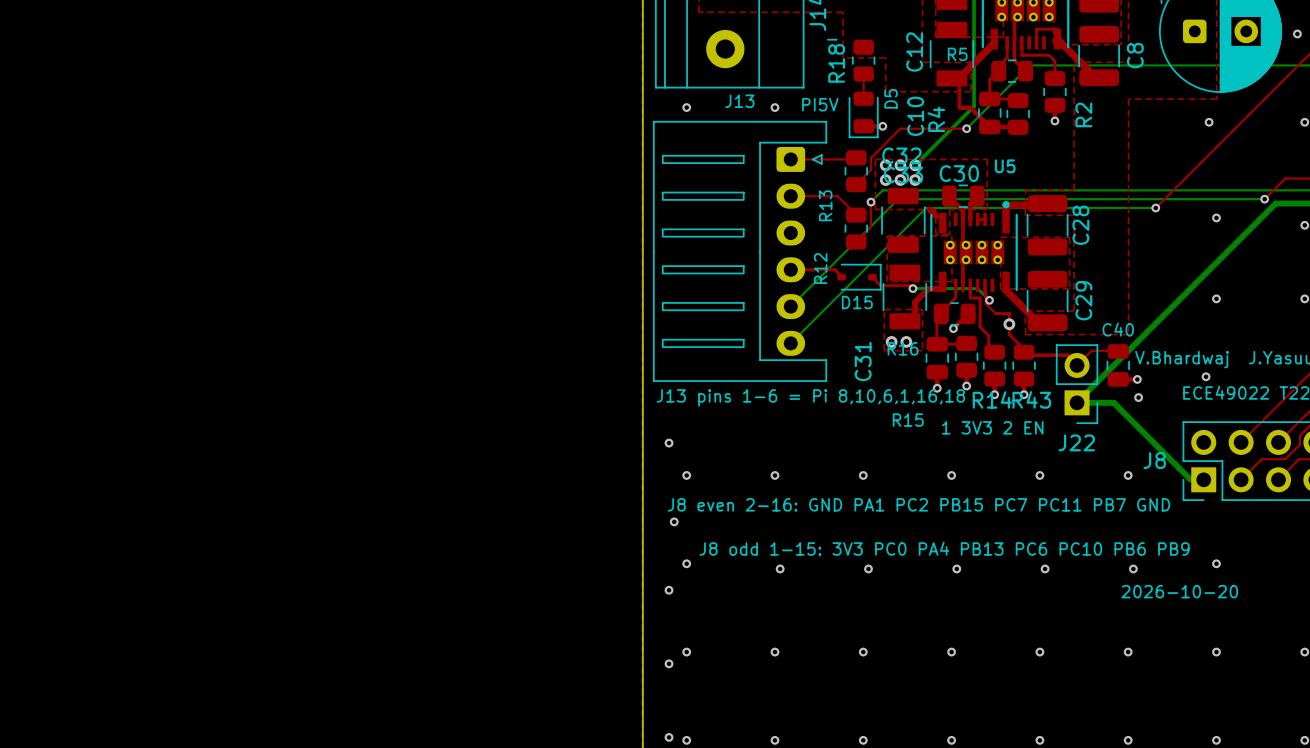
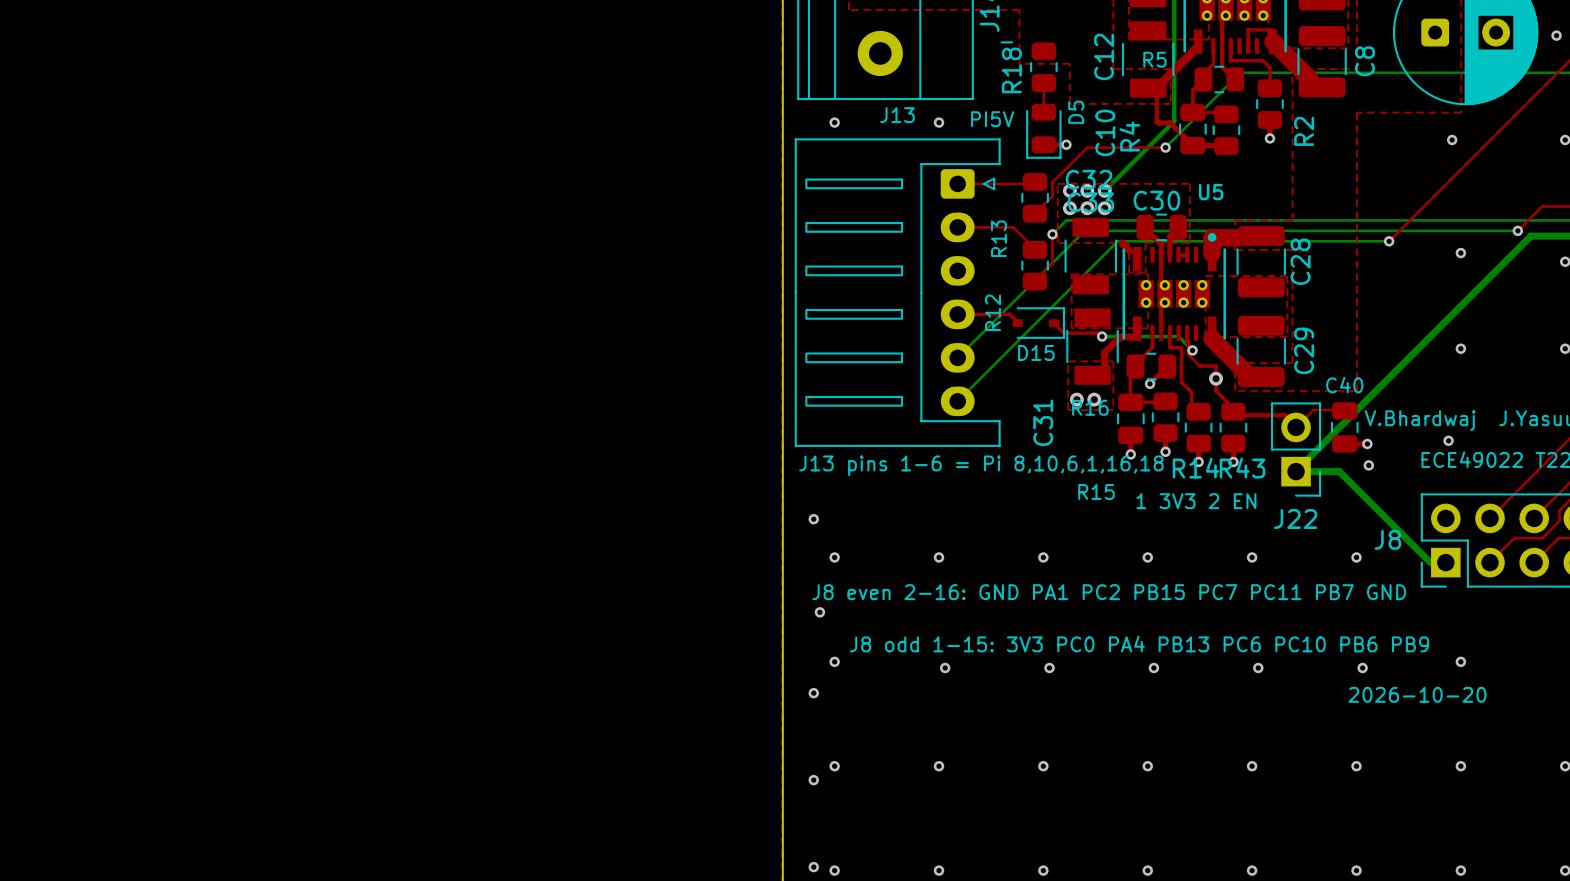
top track width: thin (1057, 39) (1088, 70) -> thick (1272, 41) (1309, 78)
top track width: thin (1029, 205) (1005, 205) (1005, 218) -> thick (1240, 237) (1212, 237) (1212, 253)
top track width: thin (1005, 290) (1034, 318) -> thick (1212, 338) (1245, 372)

